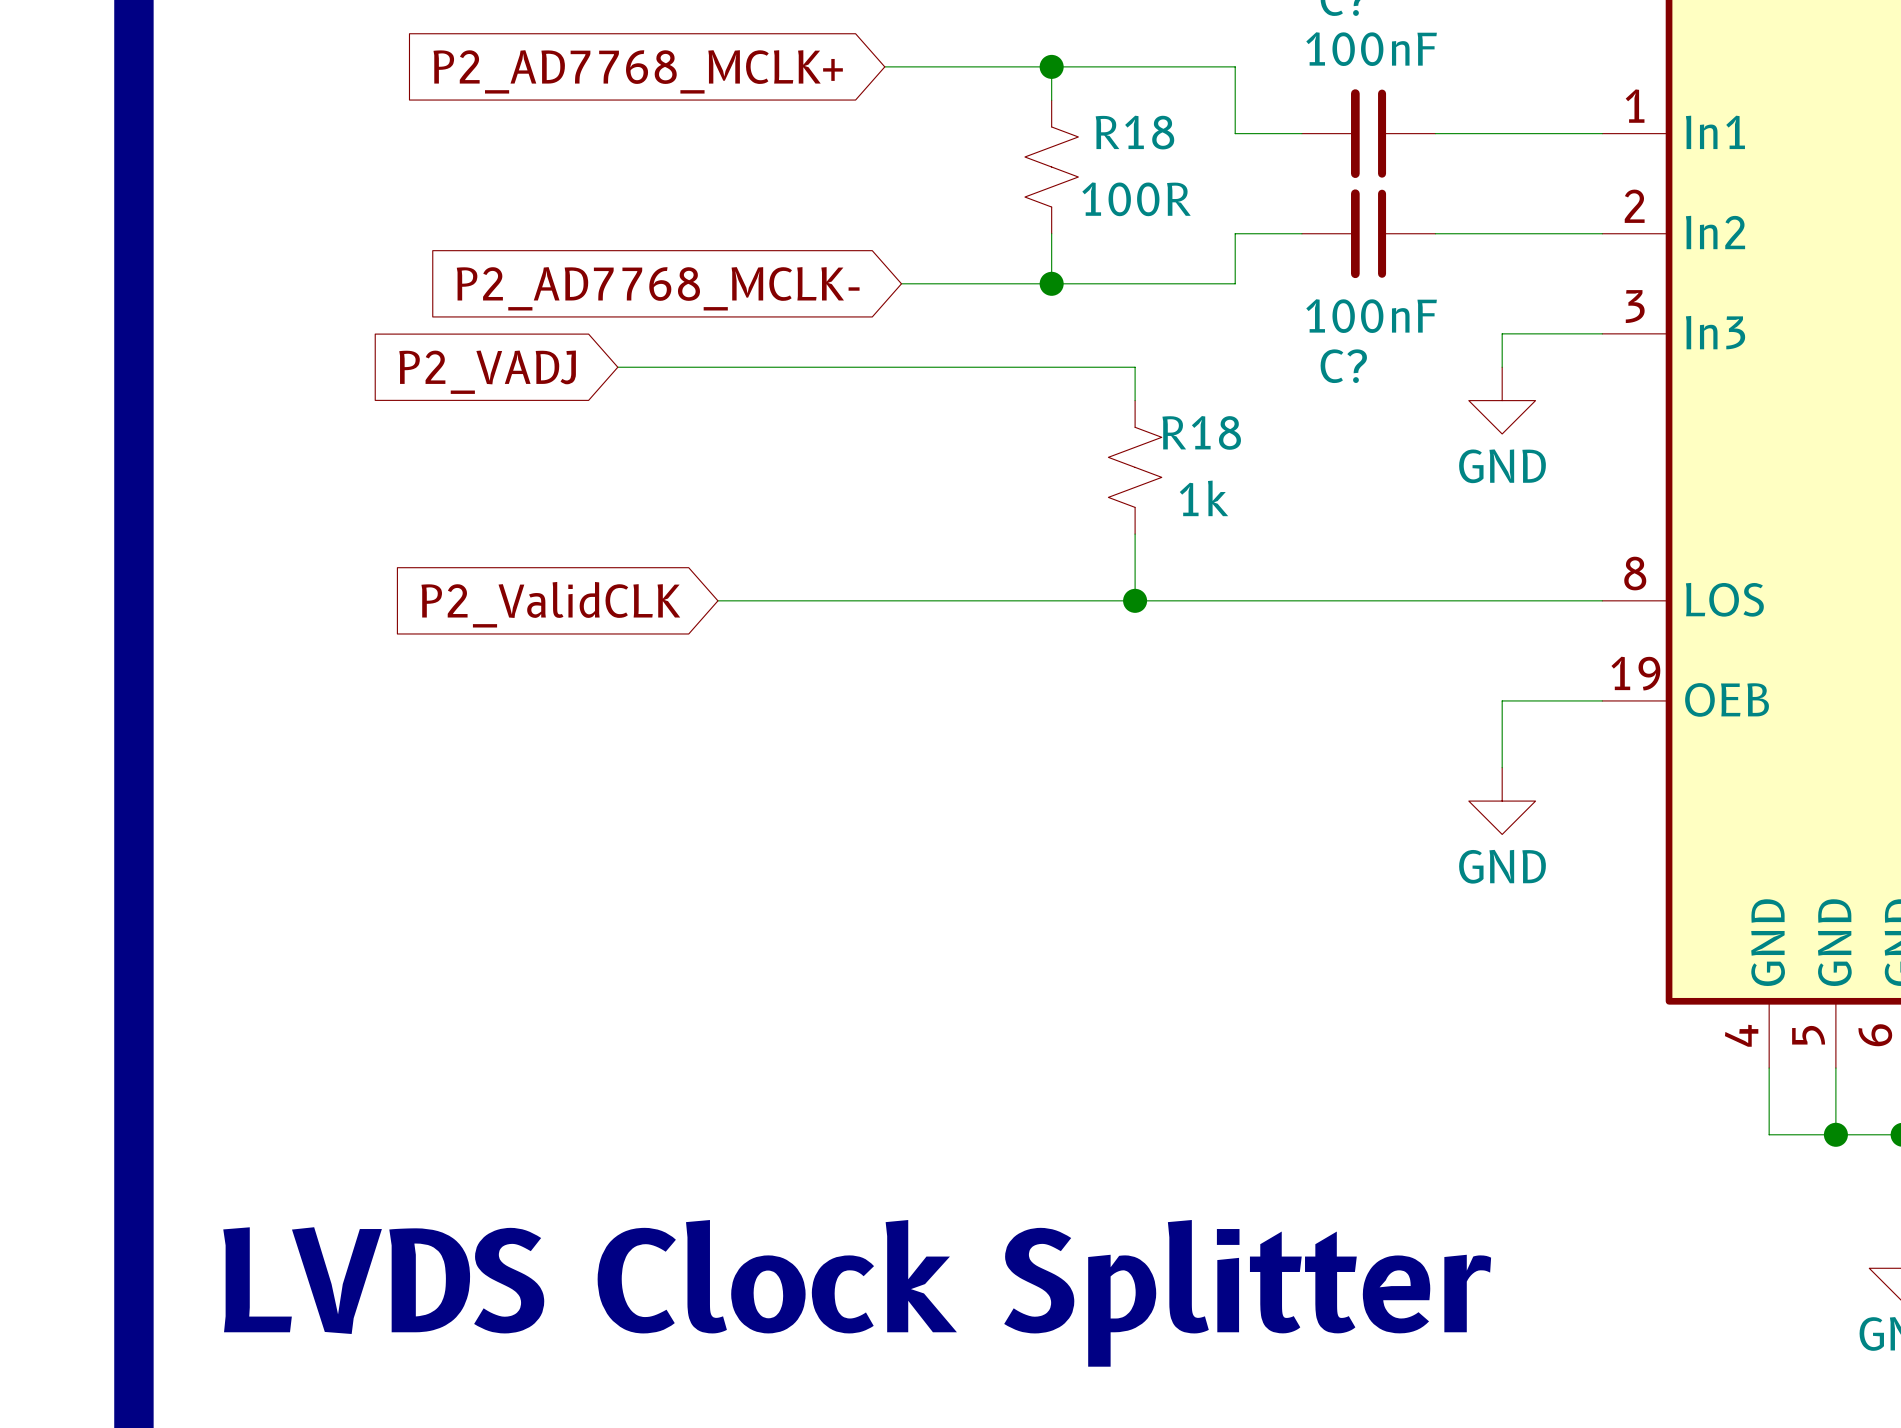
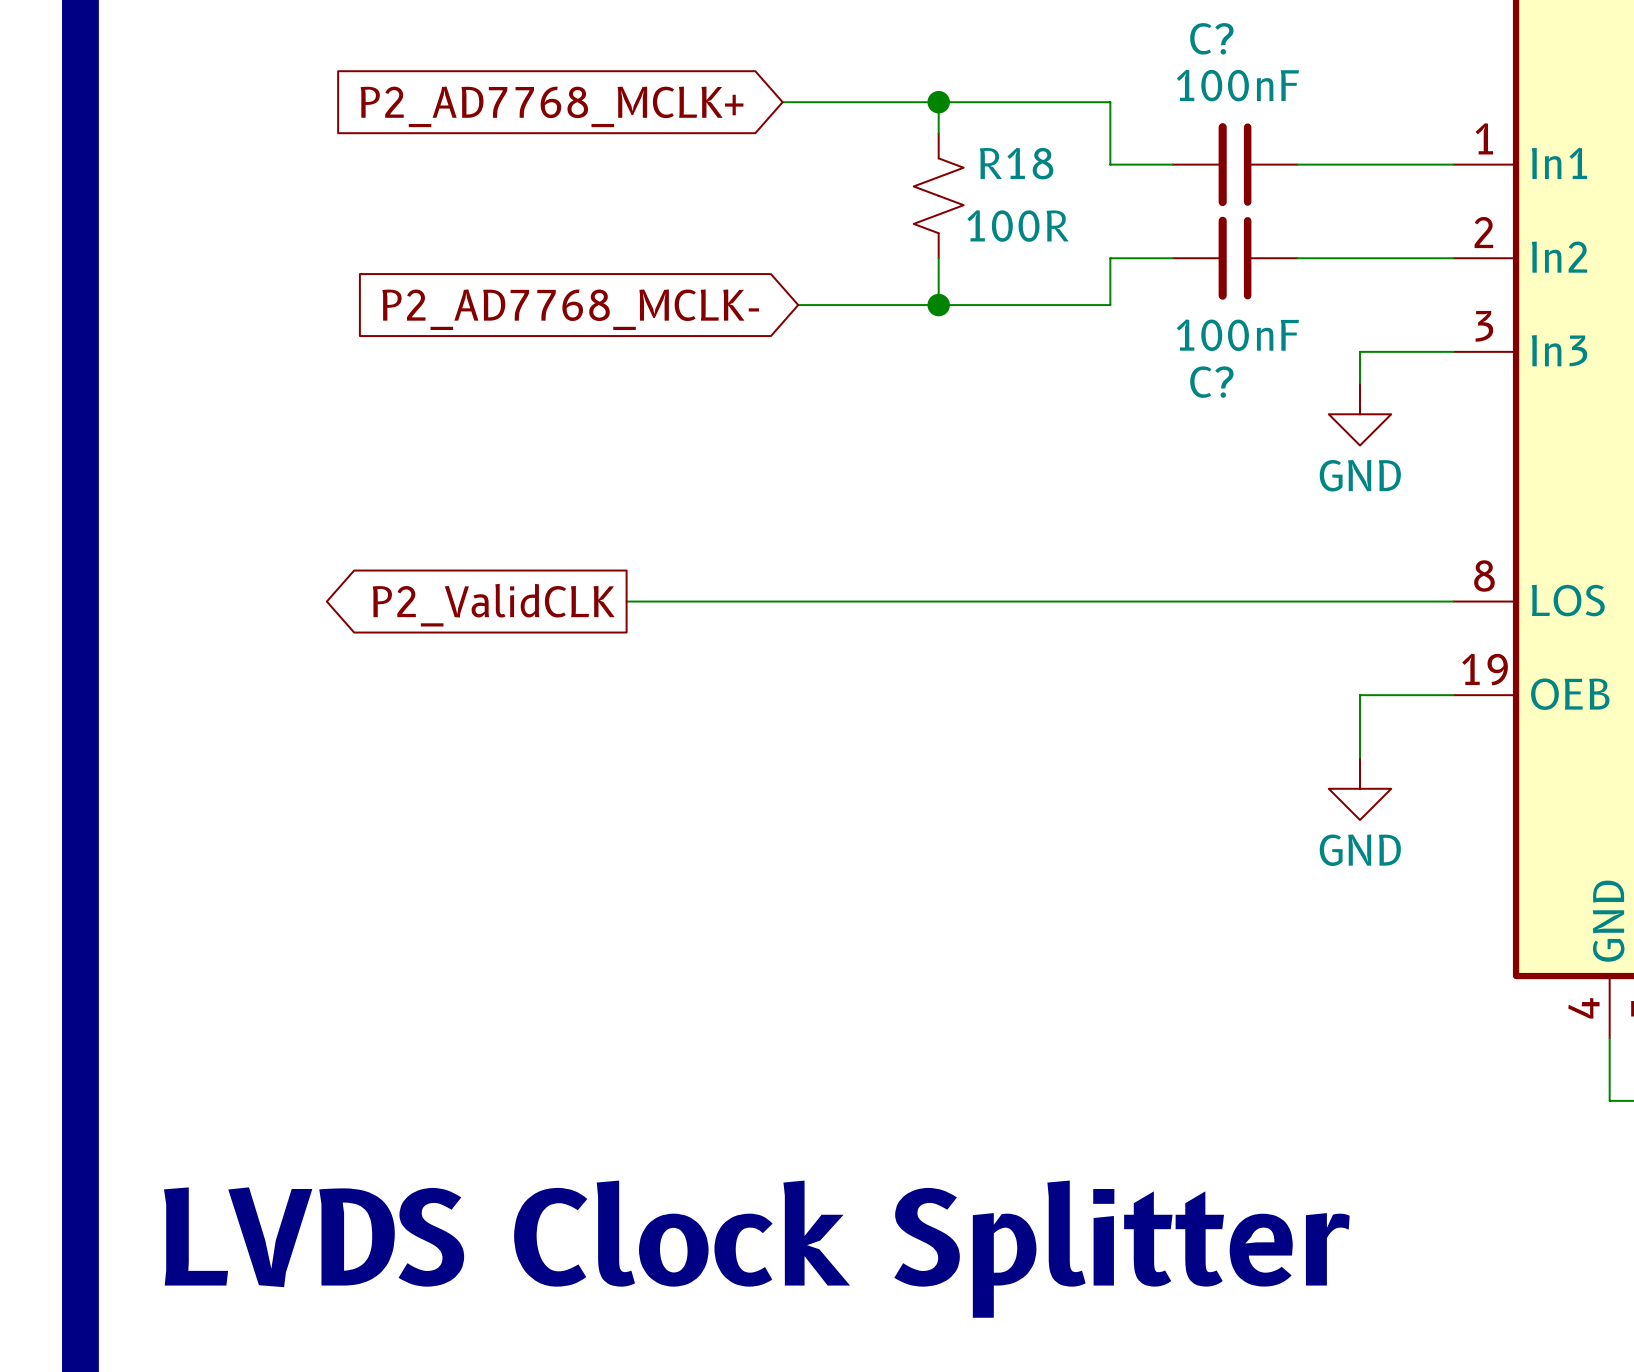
wire: (617, 367) (1135, 367) (1135, 400) -> none
global label: P2_VADJ (487, 372) -> none
R18: 1k (1135, 467) -> none
wire: (1135, 534) (1135, 600) -> none
junction: (1135, 600) -> none
global label shape: input (550, 604) -> output (493, 605)

